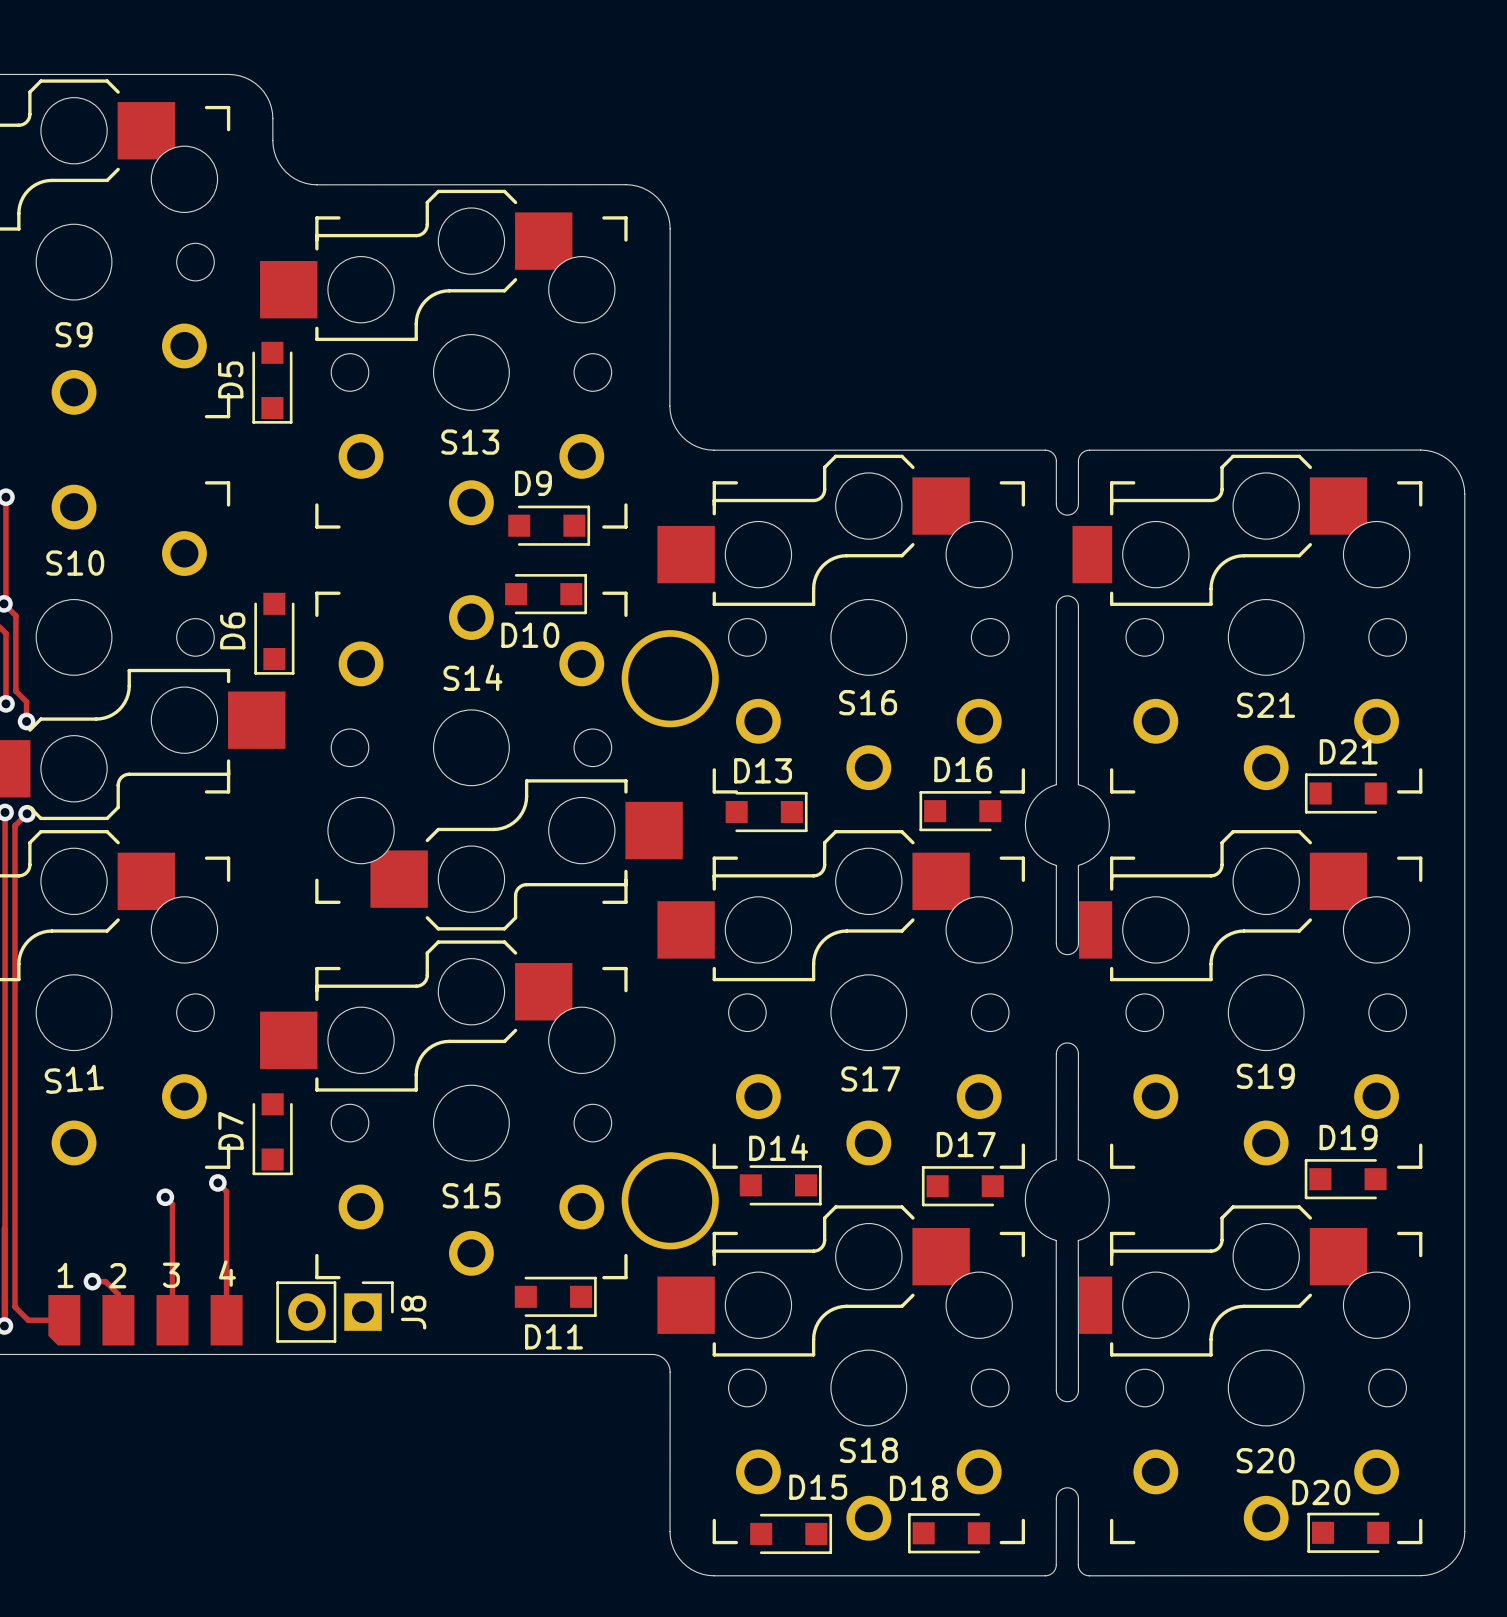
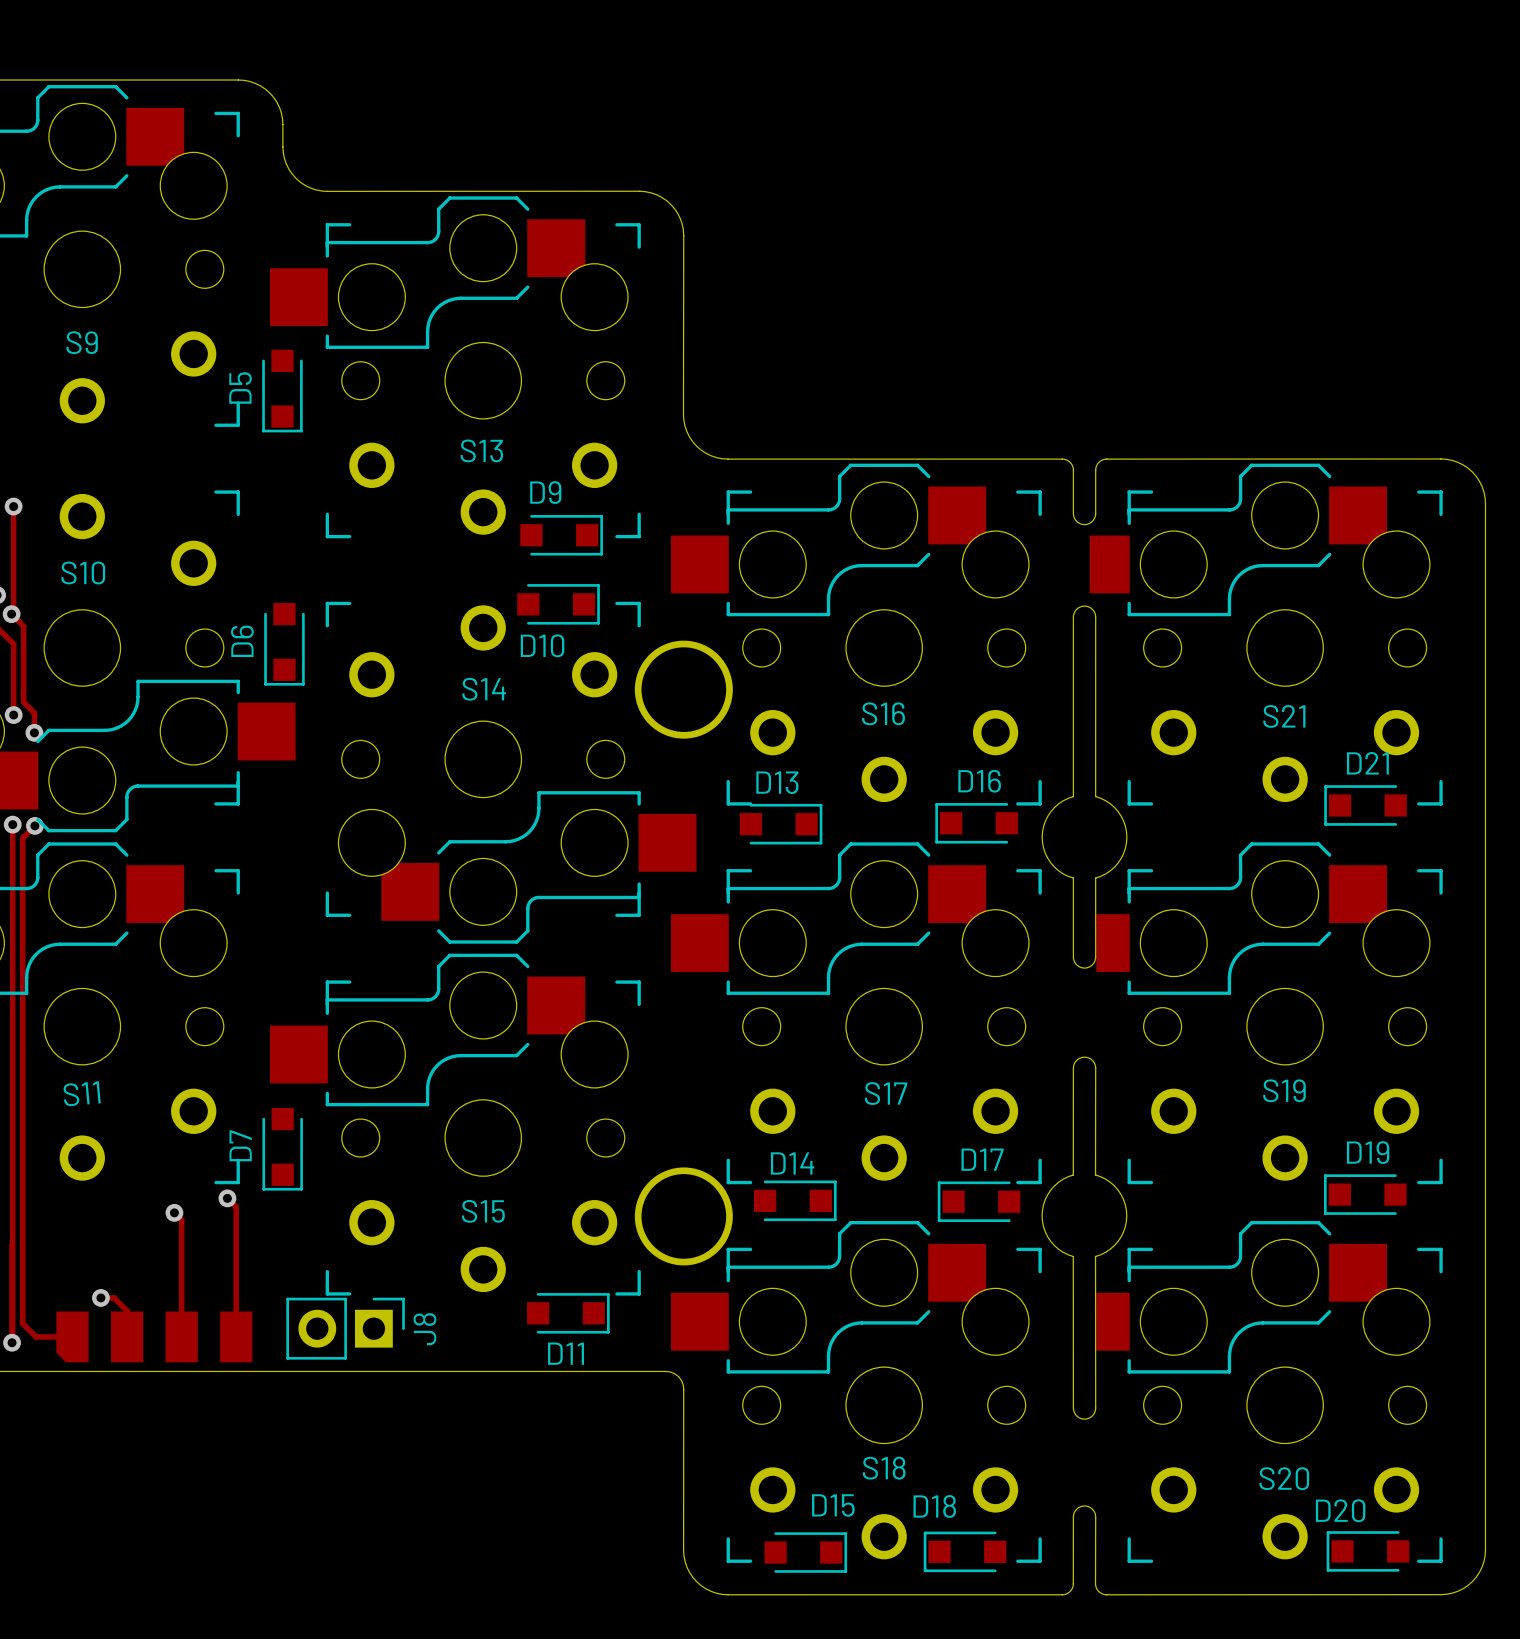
text: 4 (227, 1273) -> none
text: 1 (65, 1275) -> none
text: 2 (117, 1275) -> none
text: 3 (171, 1275) -> none

